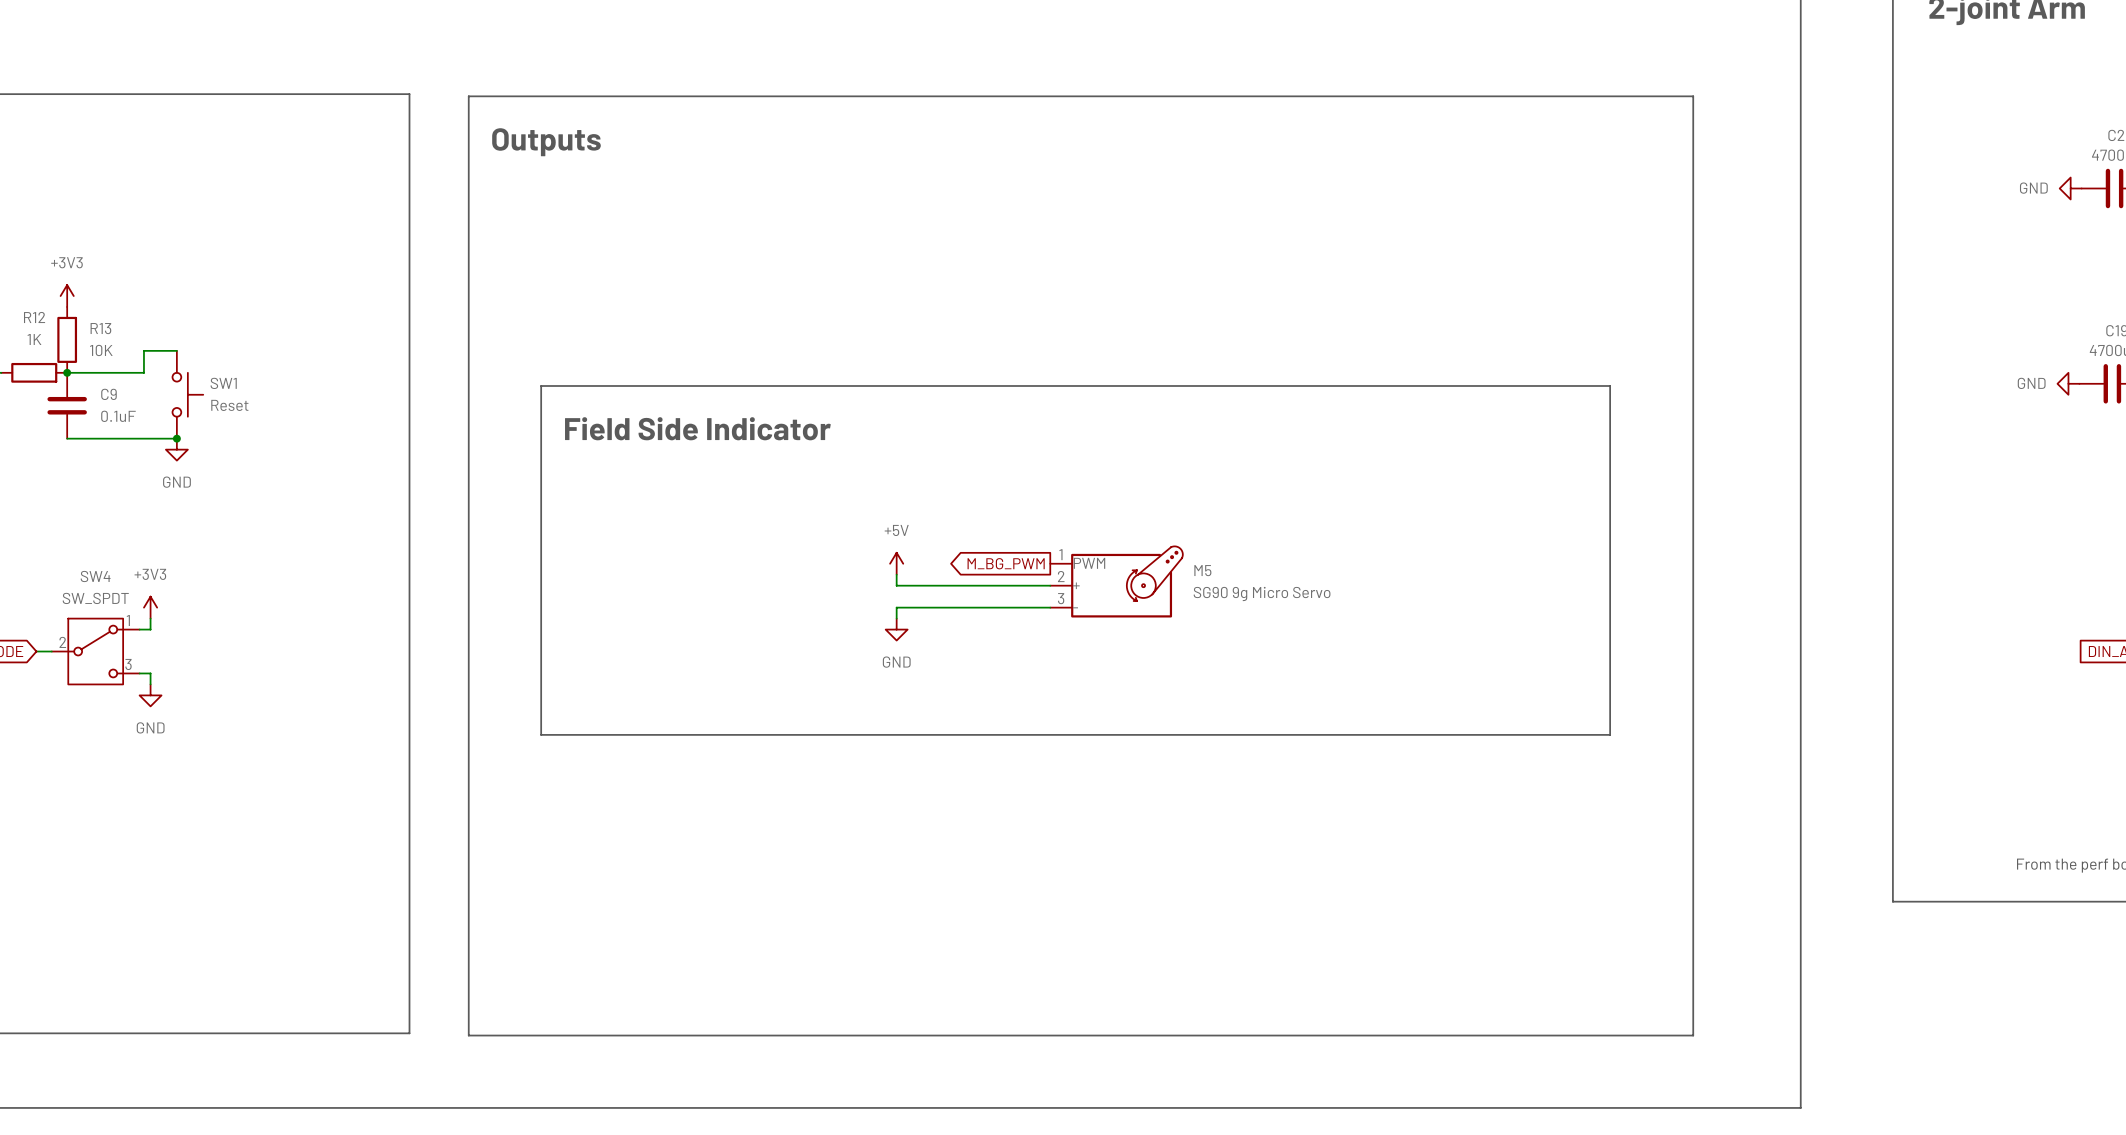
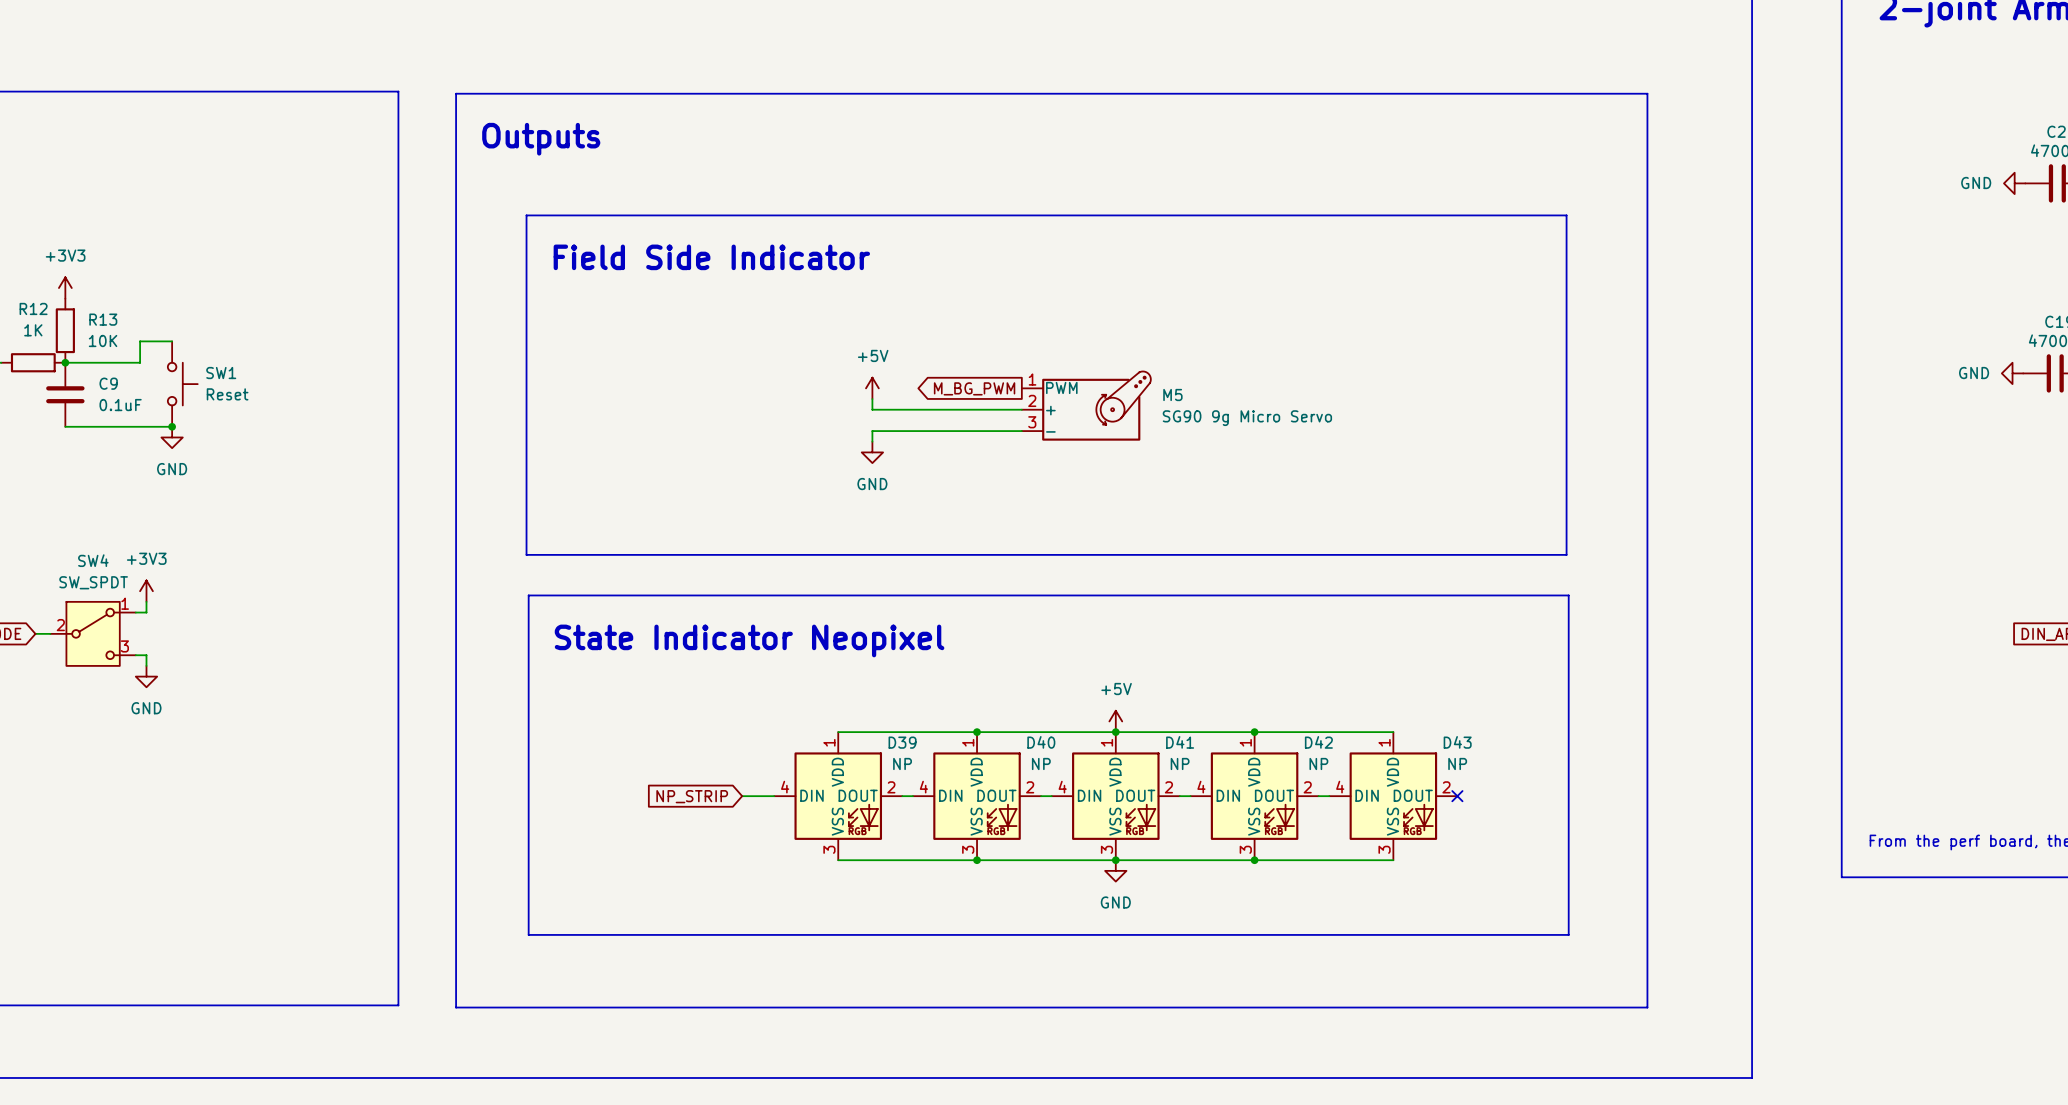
line: (541, 385) (1610, 385) -> (526, 375) (526, 215) (1566, 215) (1566, 375)
power symbol: none -> +5V (872, 388)
text position: Field Side Indicator (697, 428) -> Field Side Indicator (711, 257)
power symbol: +5V (896, 563) -> none
global label position: M_BG_PWM (1006, 563) -> M_BG_PWM (974, 388)
line: (541, 570) (541, 734) (1610, 734) (1610, 570) -> (526, 554) (1566, 554)
wire: (896, 574) (896, 585) (1050, 585) -> (872, 399) (872, 409) (1021, 409)
M5 position: (1116, 581) -> (1086, 406)
wire: (1050, 607) (896, 607) (896, 618) -> (1021, 431) (872, 431) (872, 441)
line: none -> (528, 595) (1568, 595) (1568, 934) (528, 934) (528, 595)
power symbol position: GND (896, 629) -> GND (872, 452)
text: none -> State Indicator Neopixel (749, 640)
power symbol: none -> +5V (1115, 721)
wire: none -> (838, 732) (1393, 732)
junction: none -> (977, 732)
junction: none -> (1115, 732)
junction: none -> (1254, 732)
global label: none -> NP_STRIP (692, 796)
wire: none -> (742, 796) (774, 796)
D39: none -> NP (838, 796)
wire: none -> (902, 796) (912, 796)
D40: none -> NP (977, 796)
wire: none -> (1041, 796) (1051, 796)
D41: none -> NP (1115, 796)
wire: none -> (1179, 796) (1190, 796)
D42: none -> NP (1254, 796)
wire: none -> (1318, 796) (1329, 796)
D43: none -> NP (1393, 796)
no-connect mark: none -> (1457, 796)
wire: none -> (838, 860) (1393, 860)
junction: none -> (977, 860)
junction: none -> (1115, 860)
junction: none -> (1254, 860)
power symbol: none -> GND (1115, 870)

